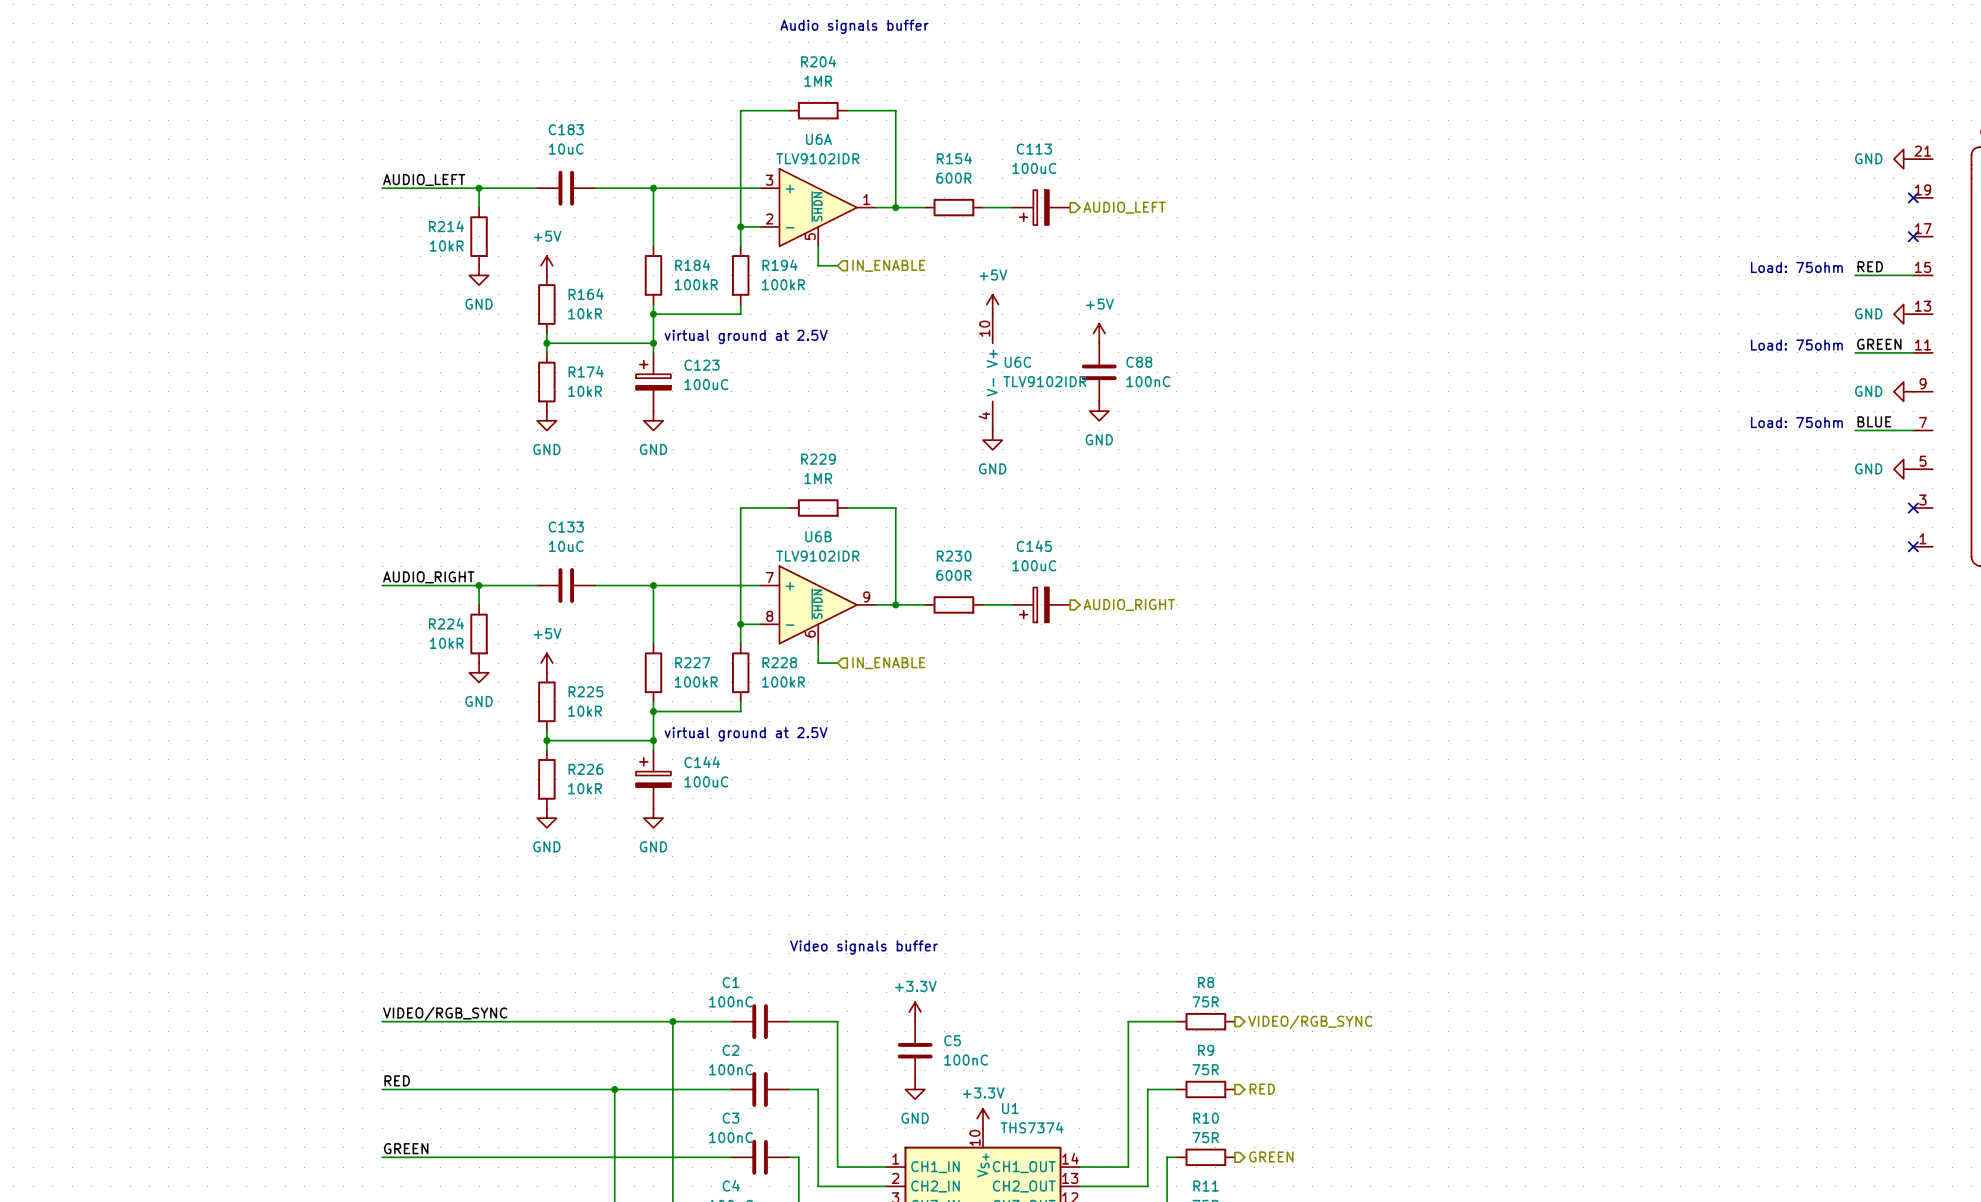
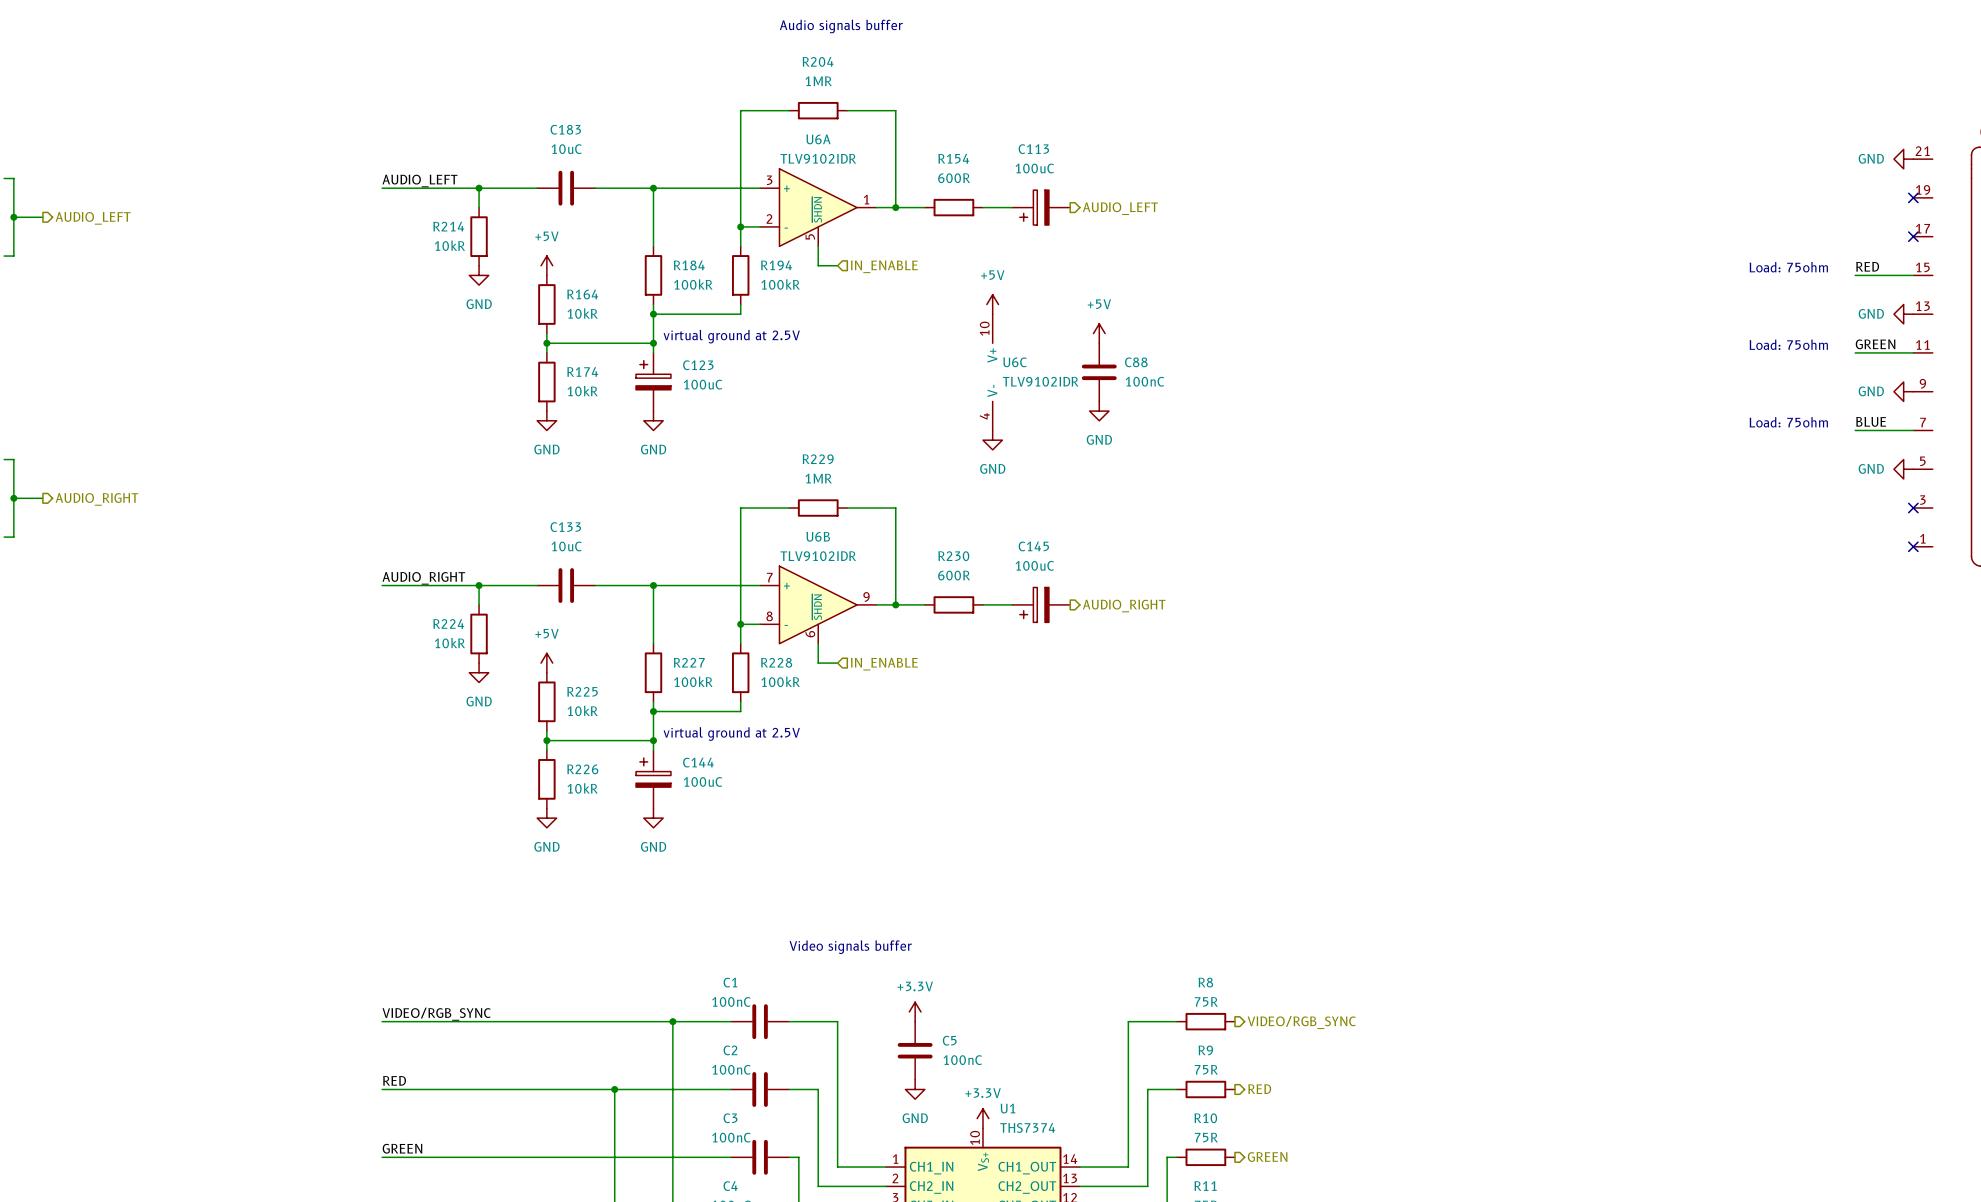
wire: none -> (4, 178) (13, 178) (13, 256) (4, 256)
wire: none -> (13, 217) (42, 217)
junction: none -> (13, 217)
hierarchical label: none -> AUDIO_LEFT (93, 218)
wire: none -> (4, 459) (13, 459) (13, 537) (4, 537)
wire: none -> (13, 498) (42, 498)
junction: none -> (13, 498)
hierarchical label: none -> AUDIO_RIGHT (96, 499)

